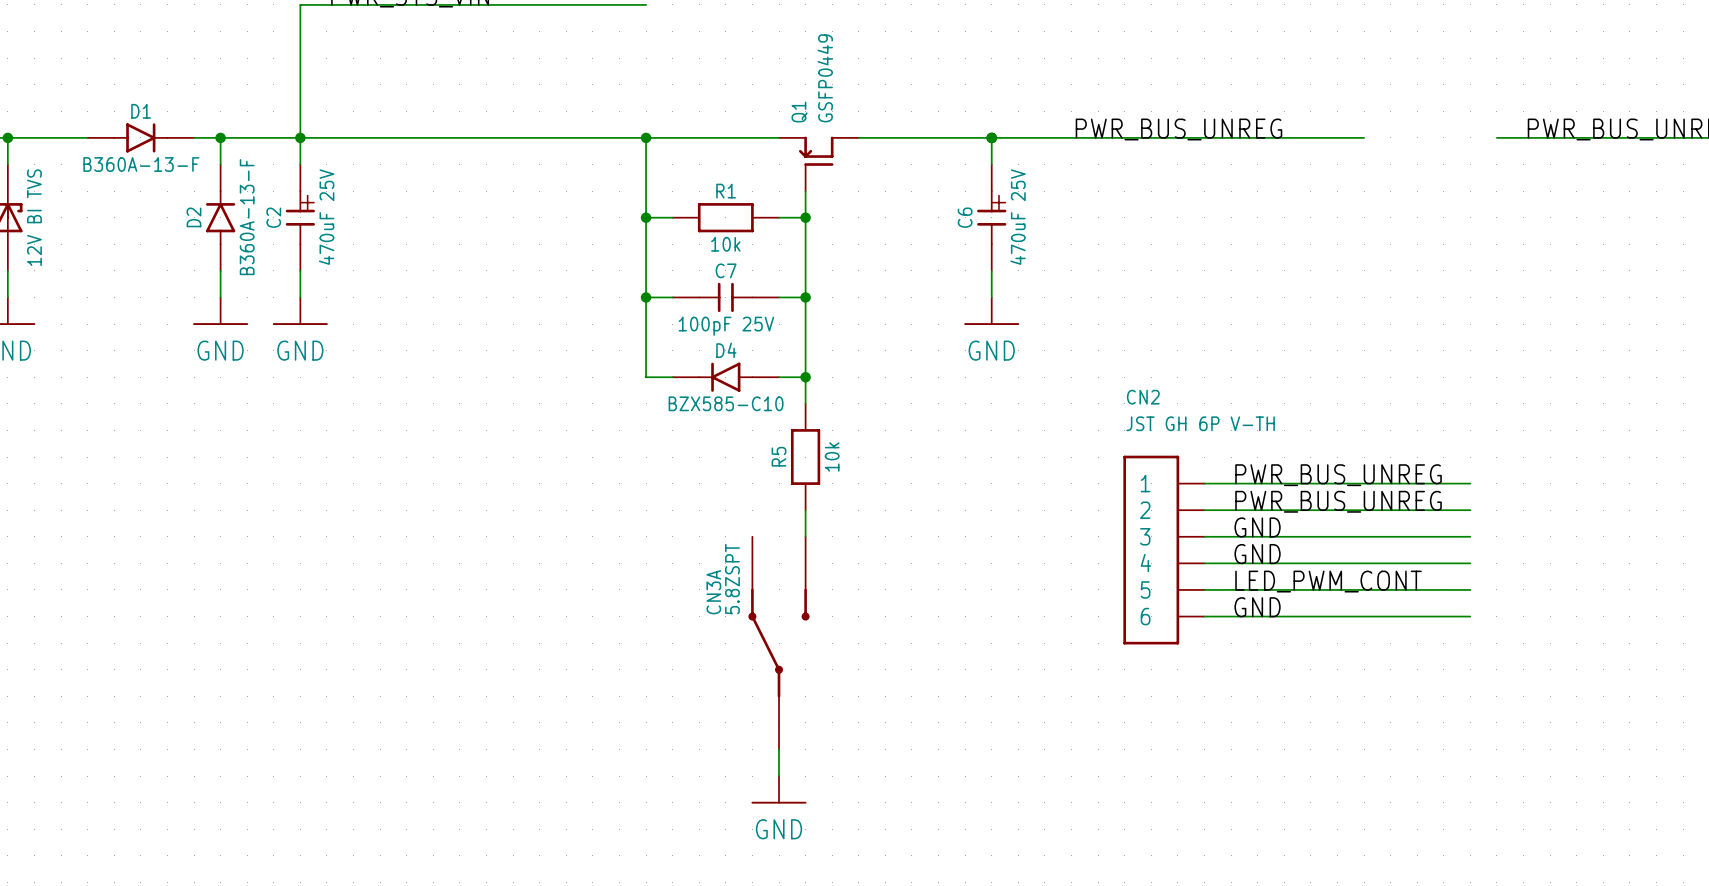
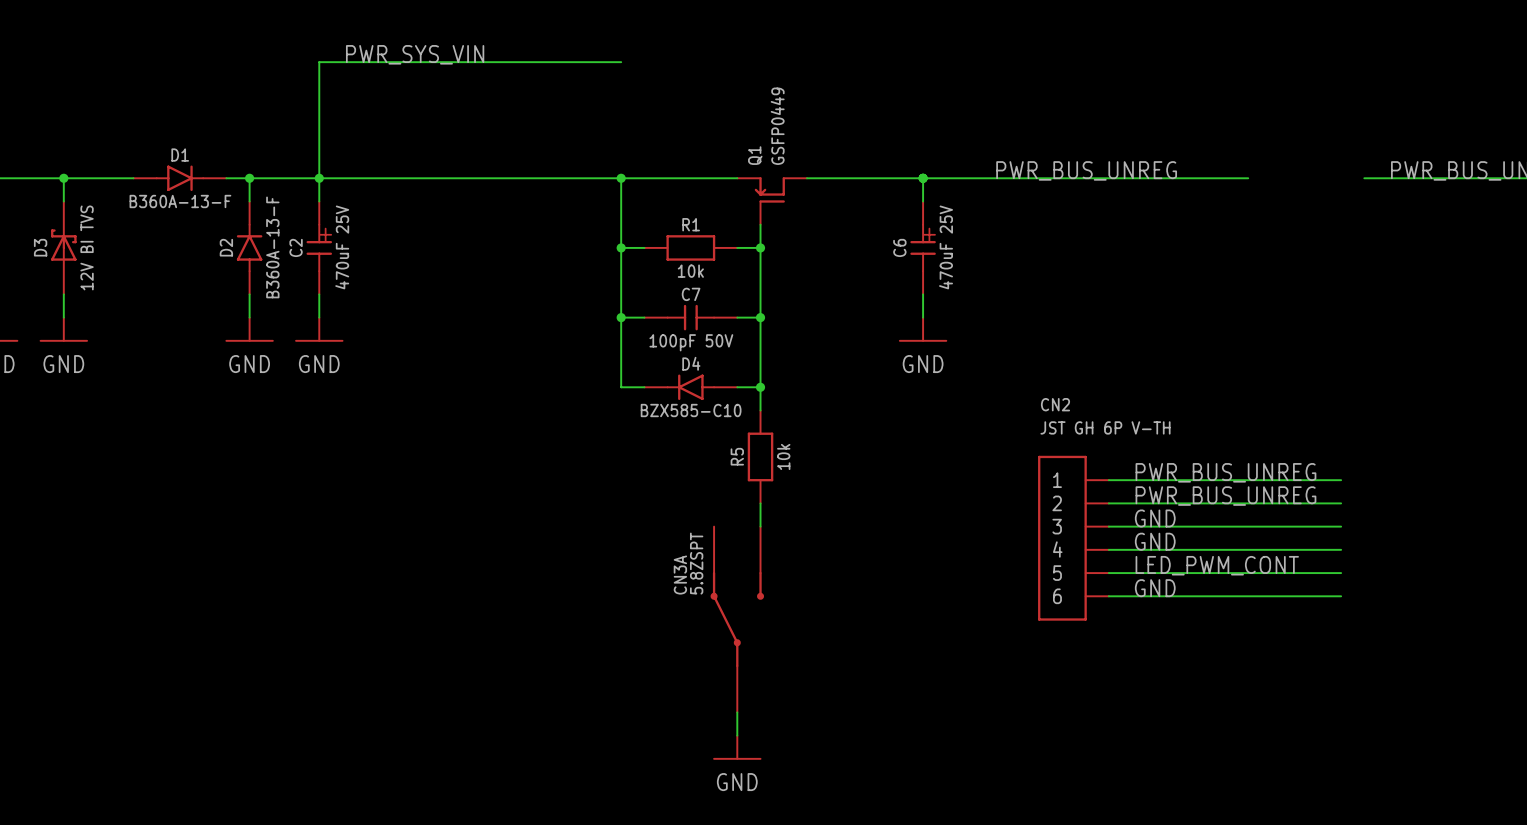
C7 value: 100pF 25V (726, 326) -> 100pF 50V (691, 342)

